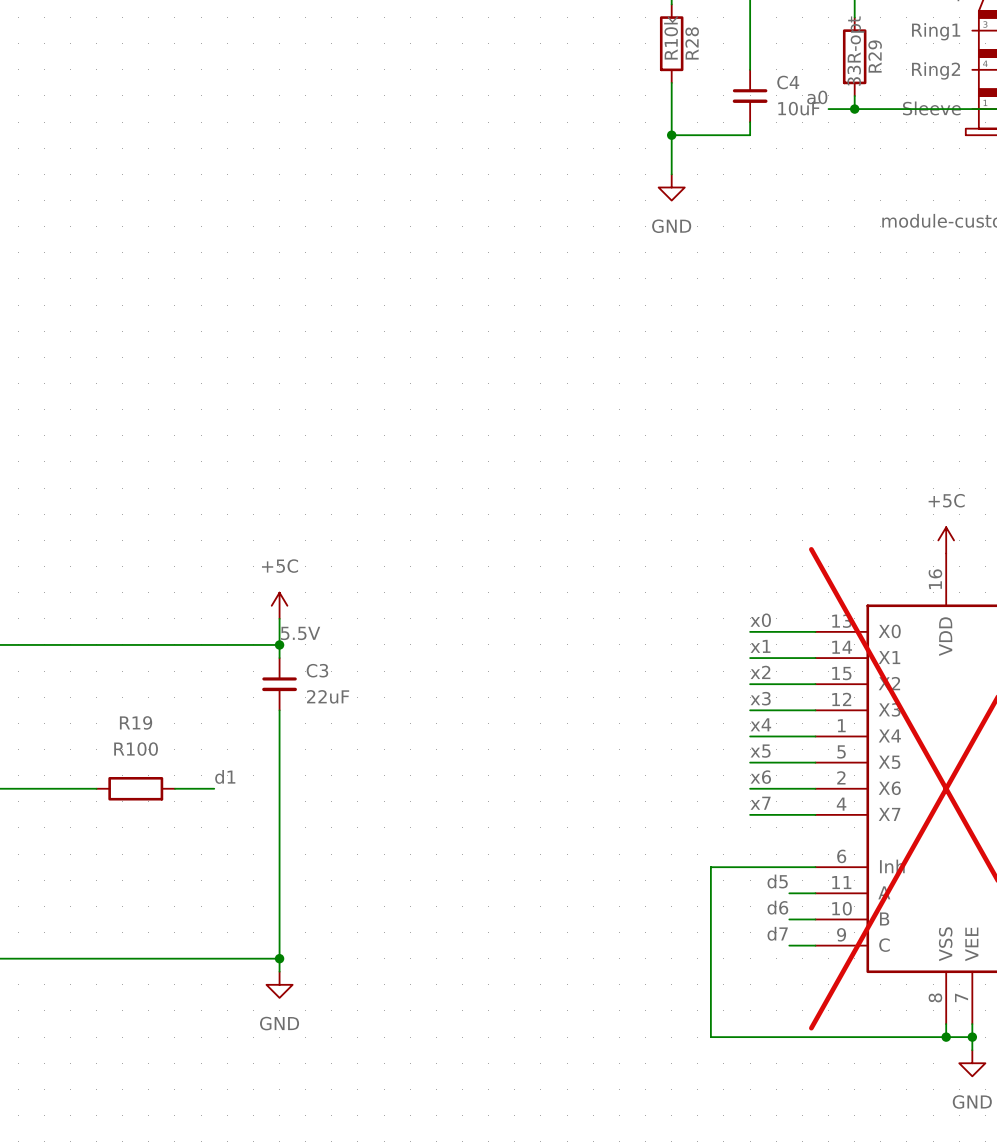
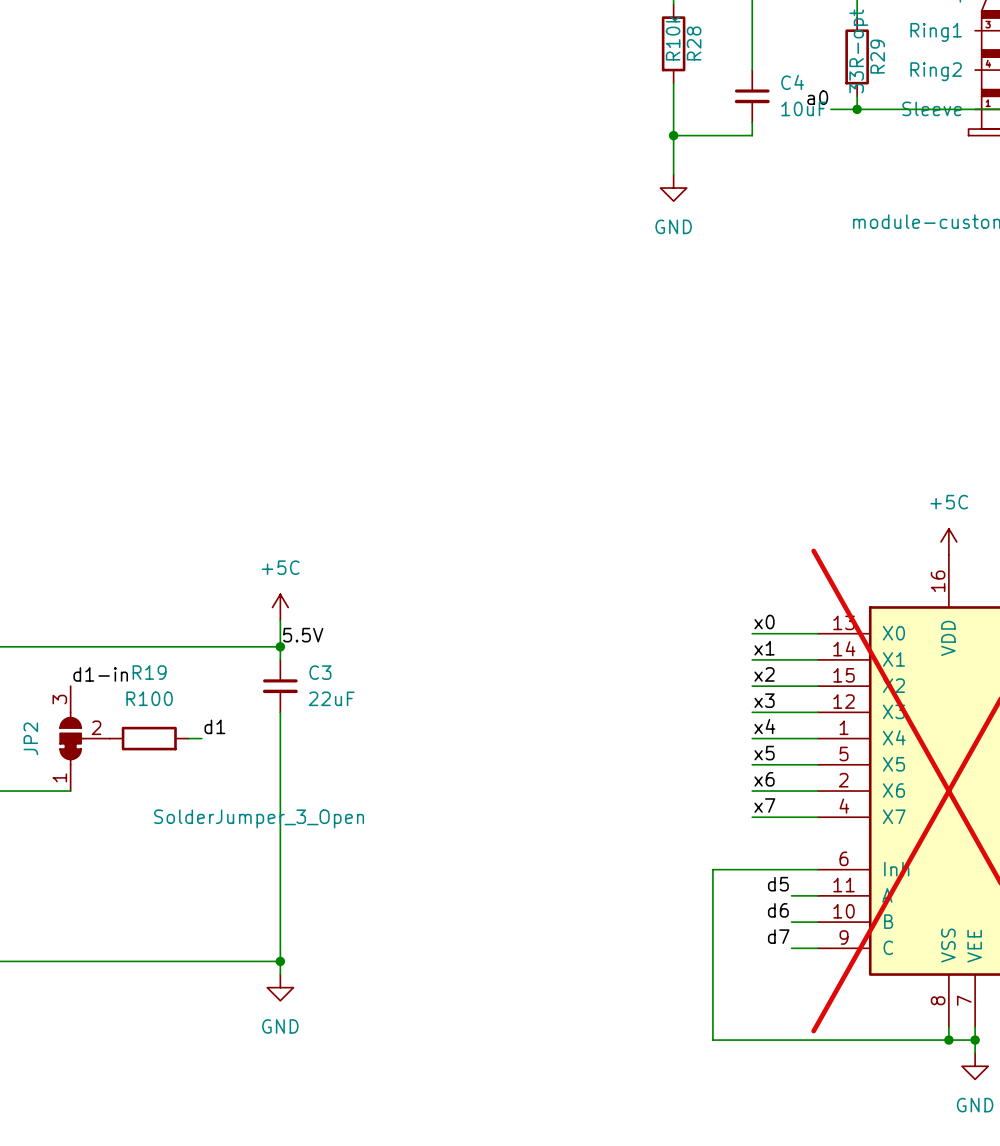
label: none -> d1-in (100, 674)
JP2: none -> SolderJumper_3_Open (85, 738)
wire: none -> (188, 738) (201, 738)
label position: d1 (225, 776) -> d1 (214, 726)
wire: (70, 788) (96, 788) -> none
R19 position: (135, 788) -> (149, 738)
wire: (174, 788) (214, 788) -> none

